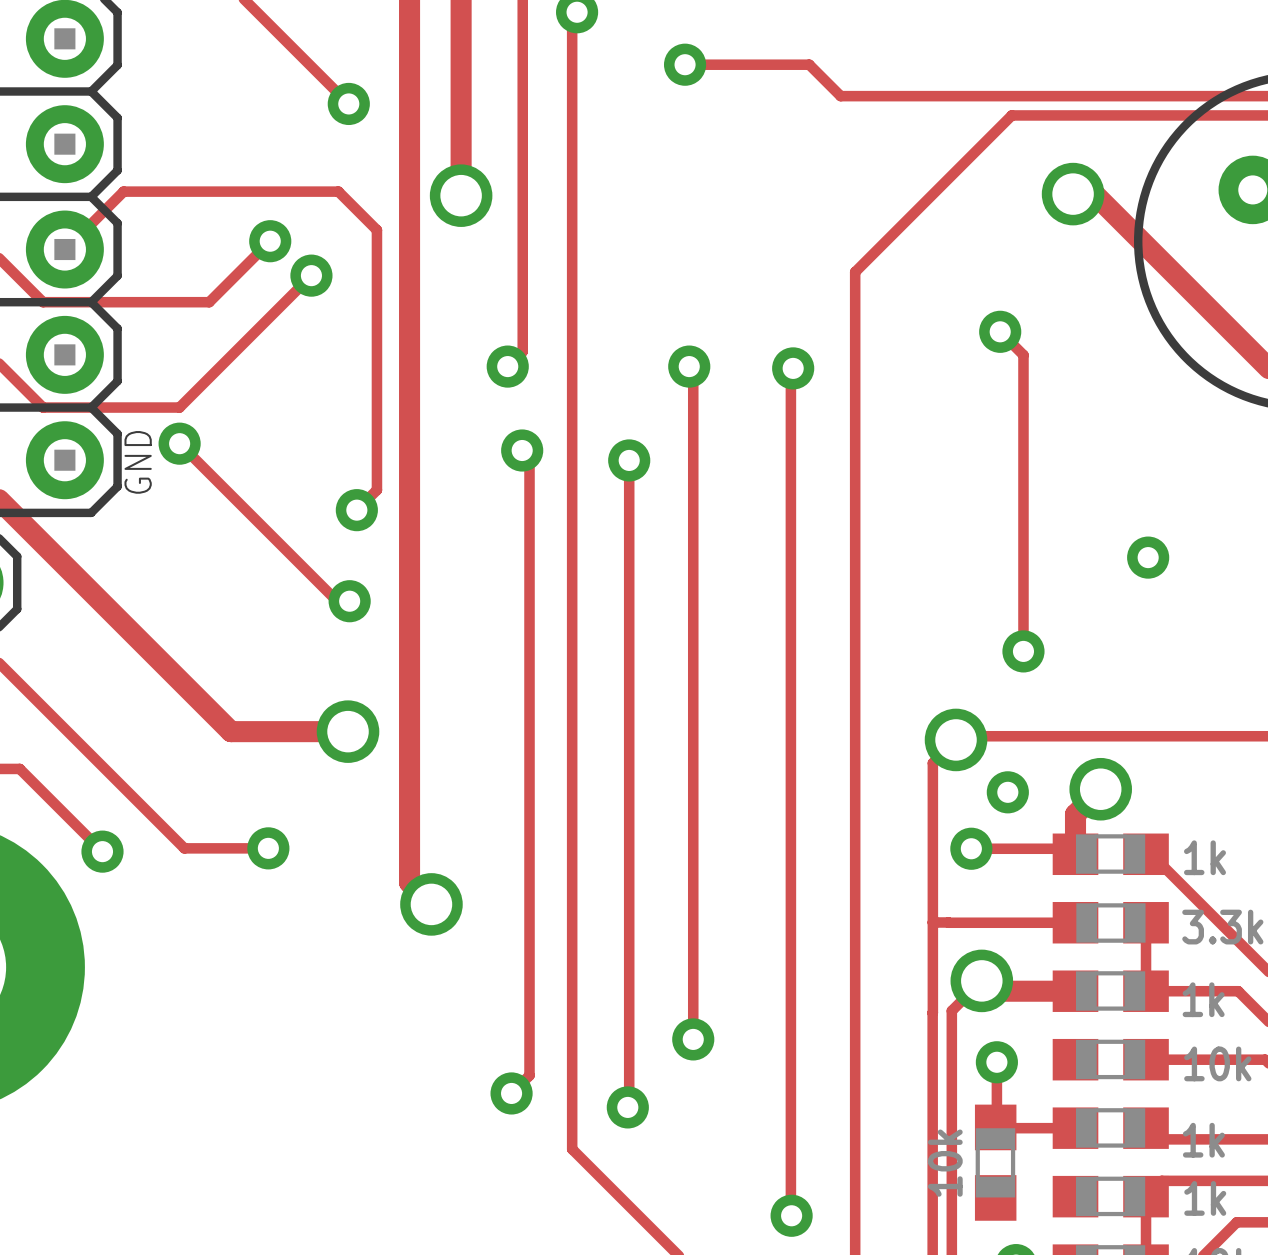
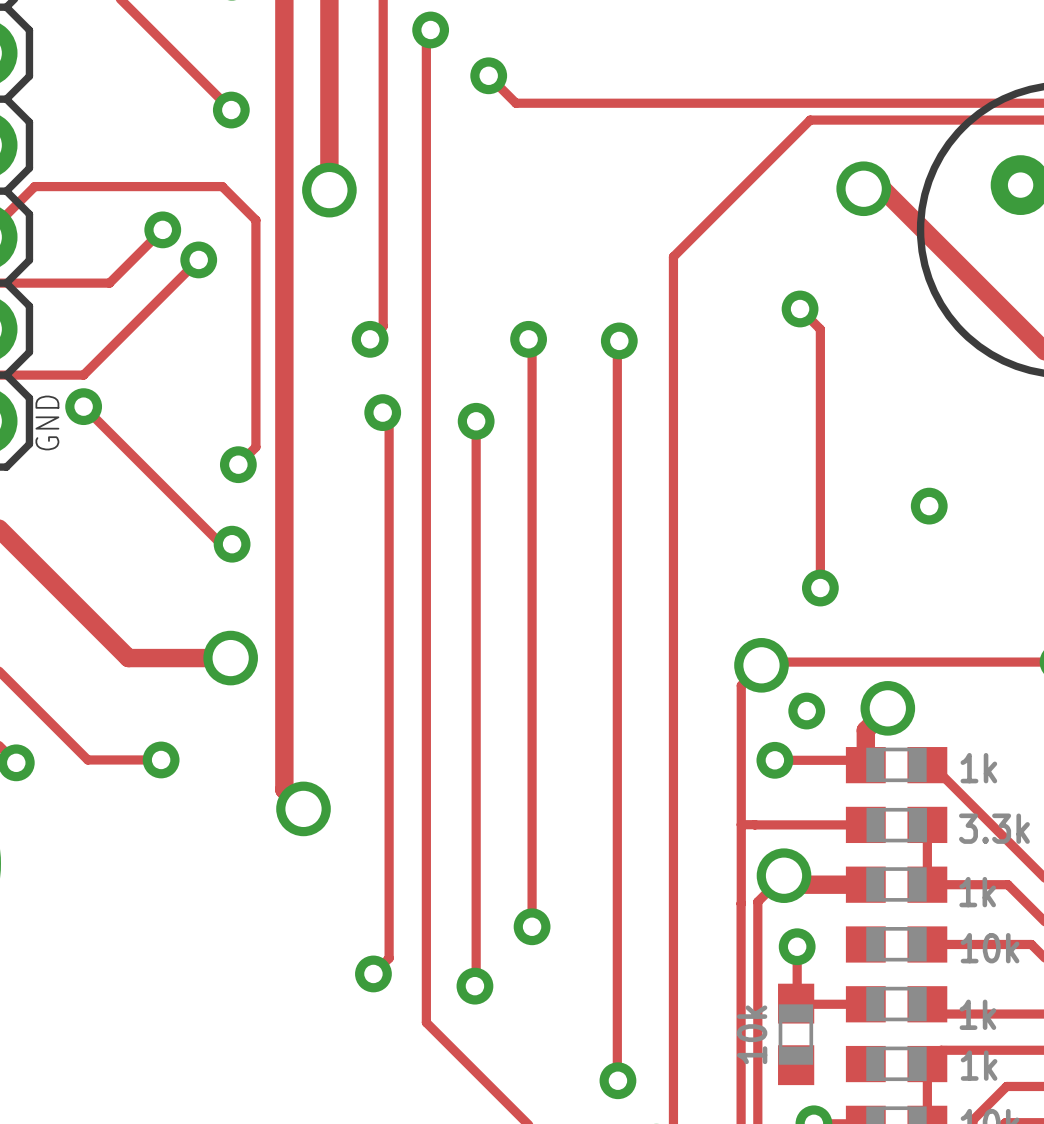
track: (685, 64) (809, 64) (840, 96) -> (488, 75) (515, 103) (660, 103)
via position: (685, 64) -> (488, 75)

